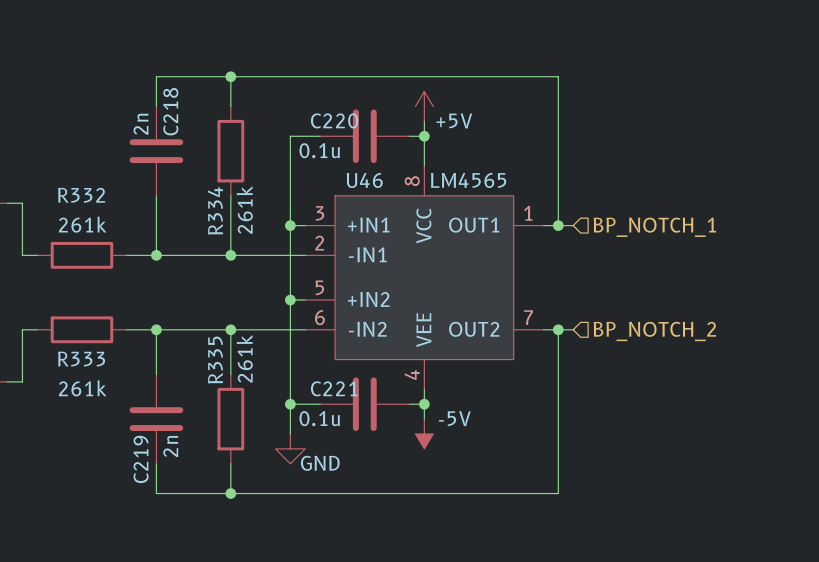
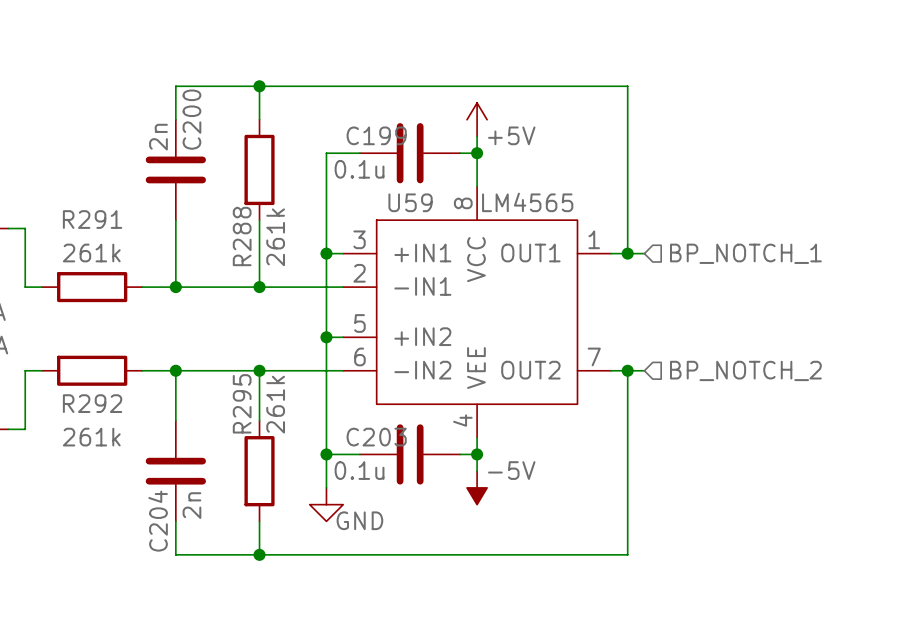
C218 name: C218 (170, 111) -> C200 (191, 119)
C220 name: C220 (334, 120) -> C199 (376, 135)
U46 name: U46 (364, 180) -> U59 (410, 202)
R332 name: R332 (81, 195) -> R291 (92, 219)
R334 name: R334 (215, 210) -> R288 (242, 236)
R333 name: R333 (81, 359) -> R292 (92, 403)
R335 name: R335 (215, 360) -> R295 (242, 403)
C221 name: C221 (334, 388) -> C203 (376, 437)
C219 name: C219 (141, 459) -> C204 (158, 521)

